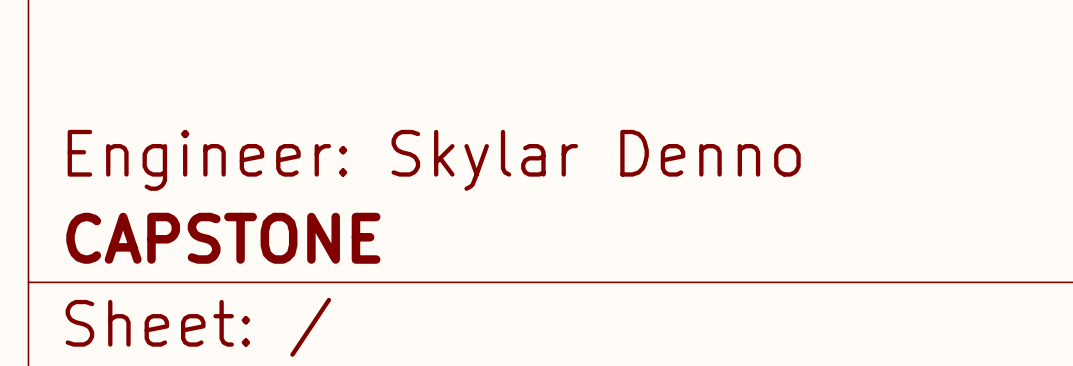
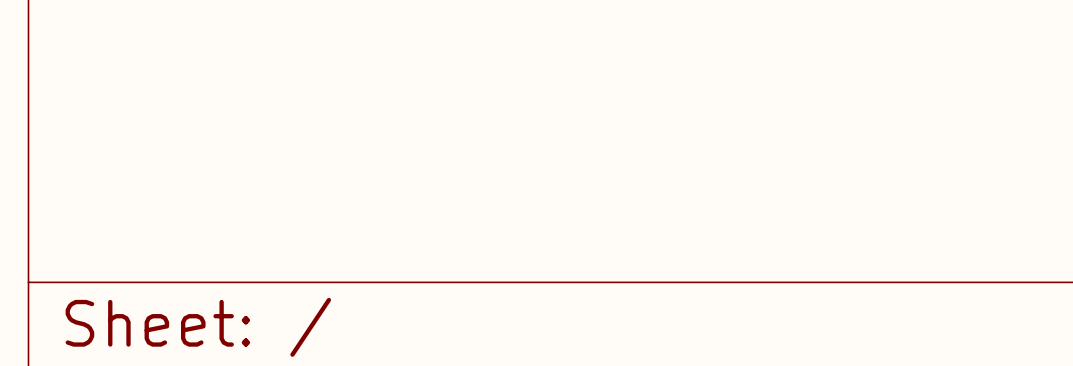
title block: Engineer: Skylar Denno (434, 160) -> none
title block: CAPSTONE (223, 238) -> none

